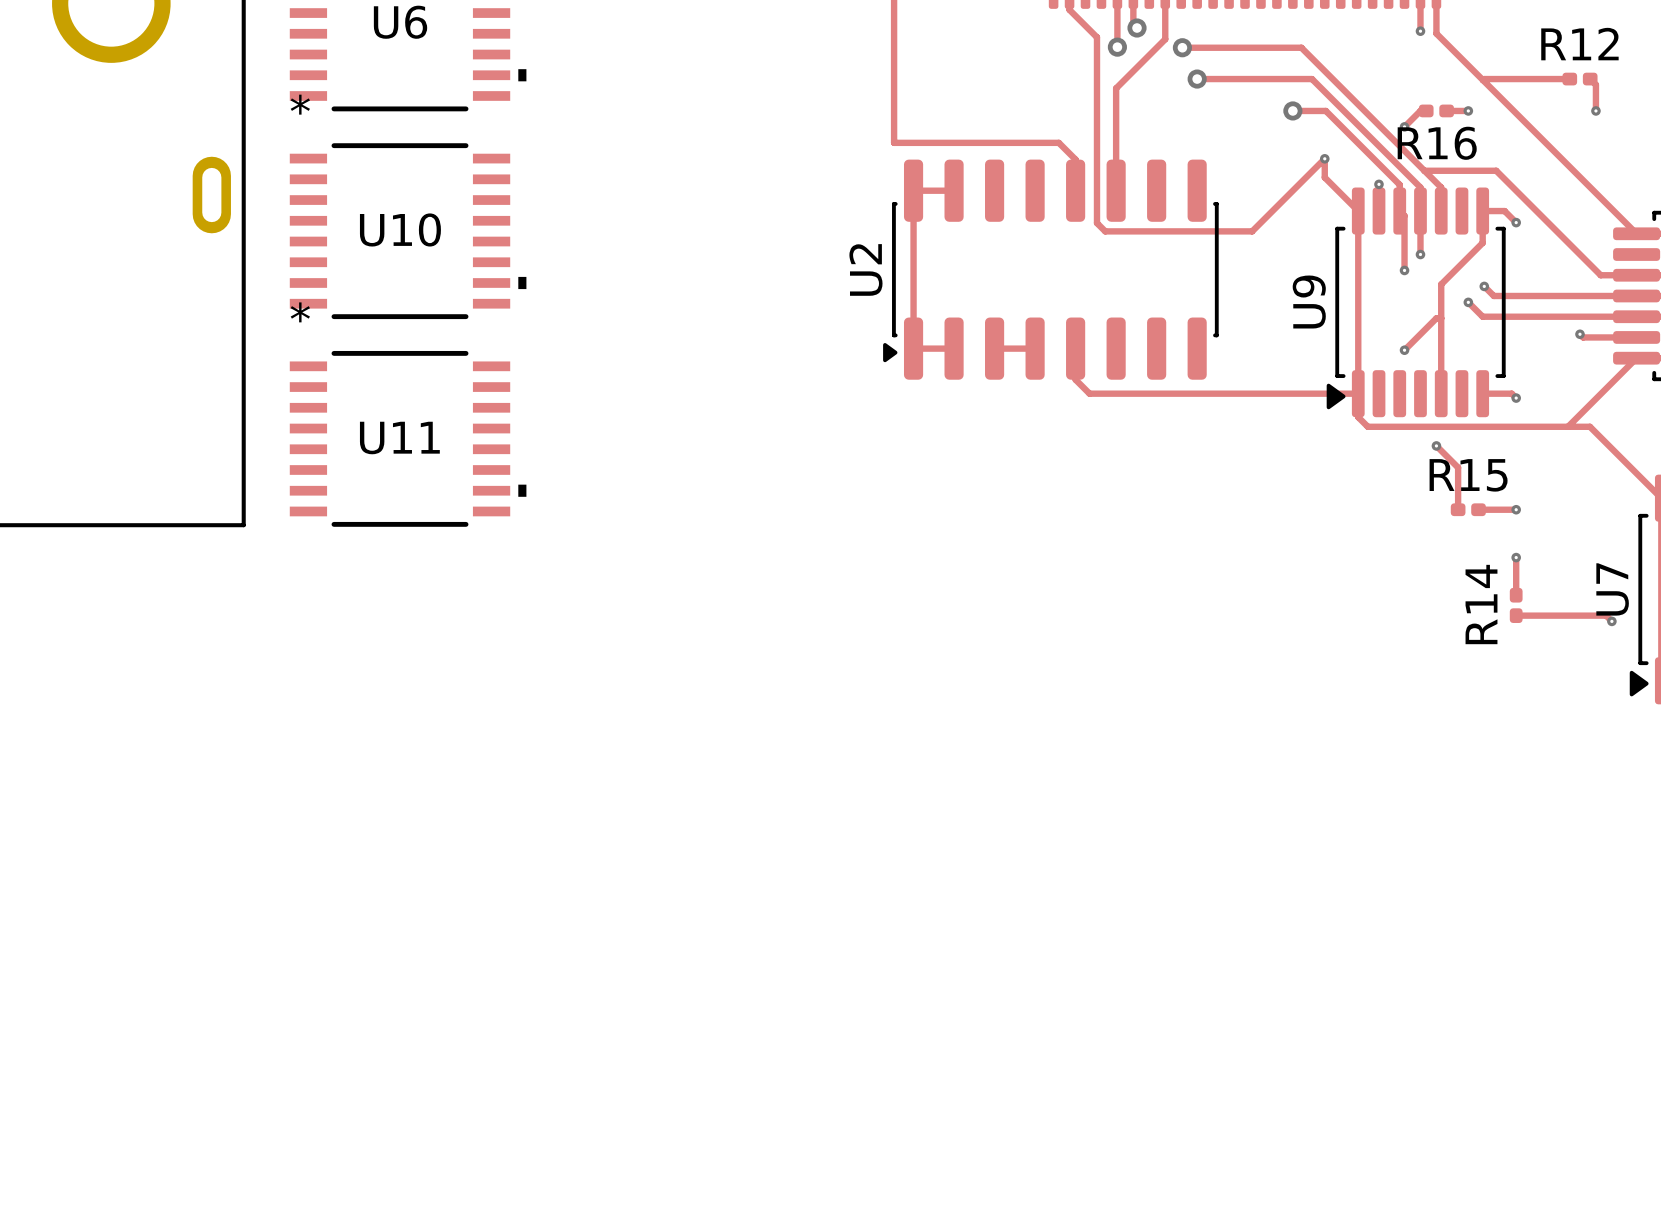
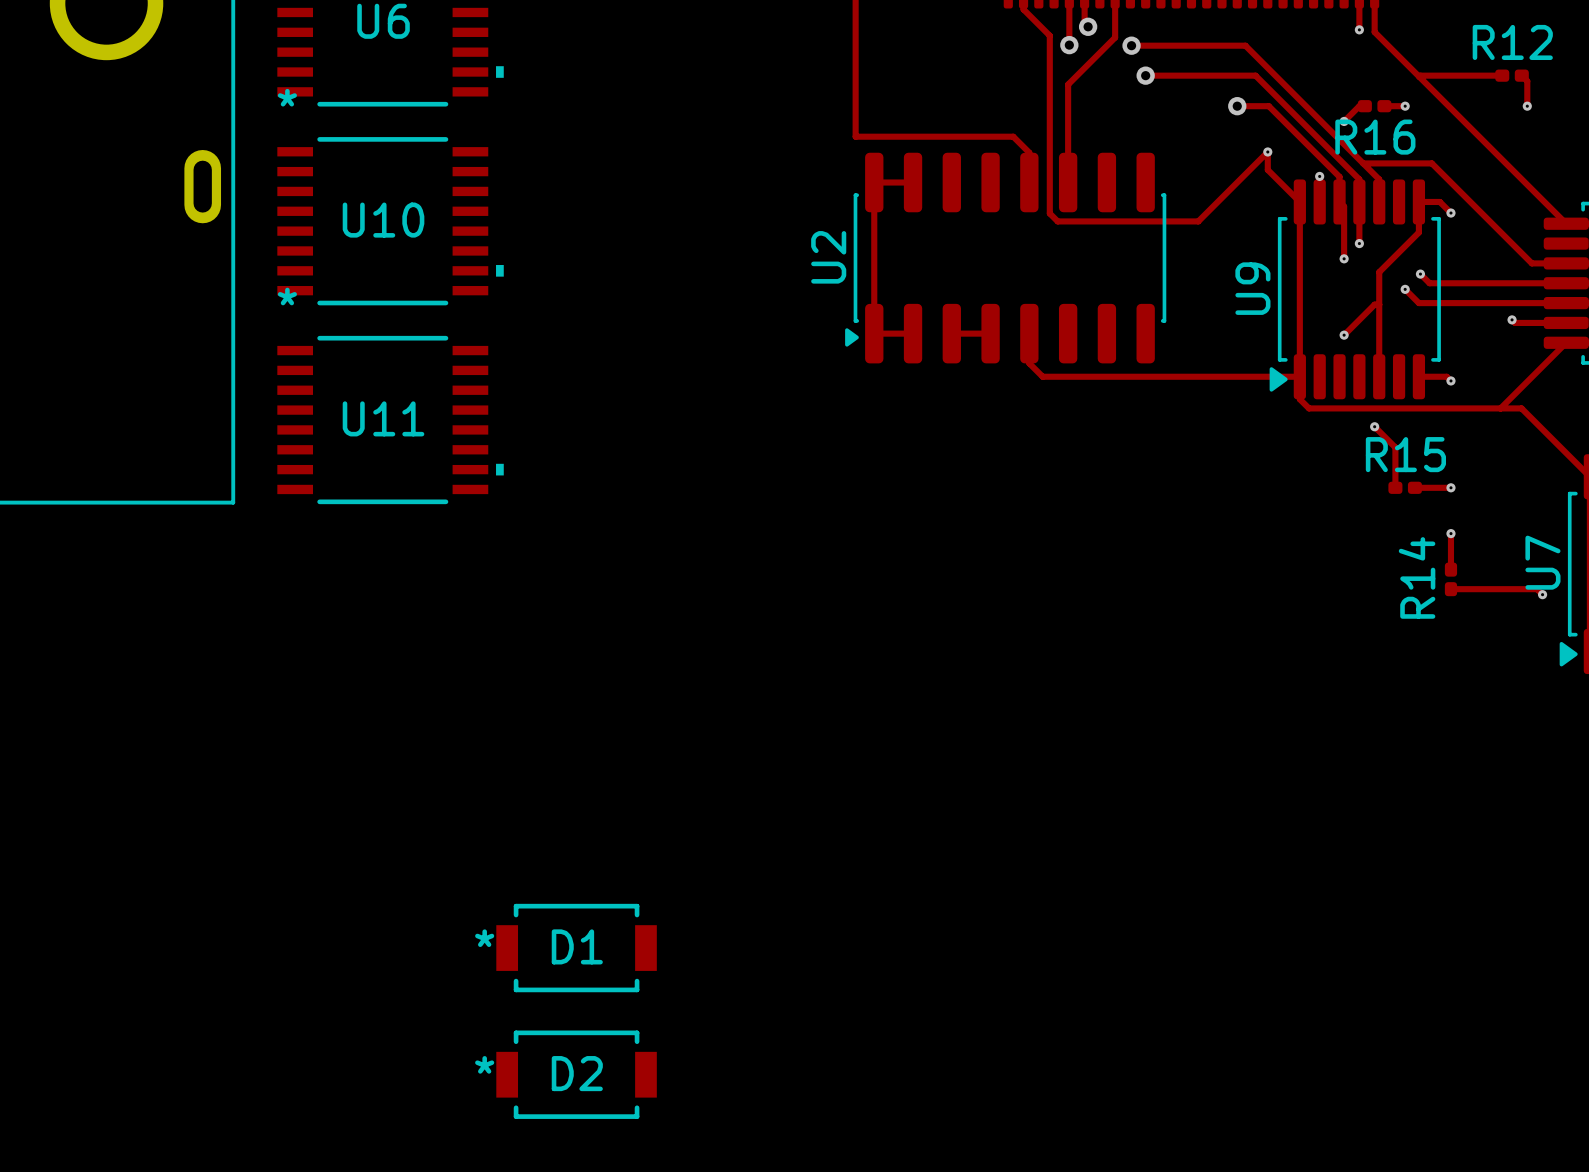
D1: none -> (576, 948)
D2: none -> (576, 1074)

